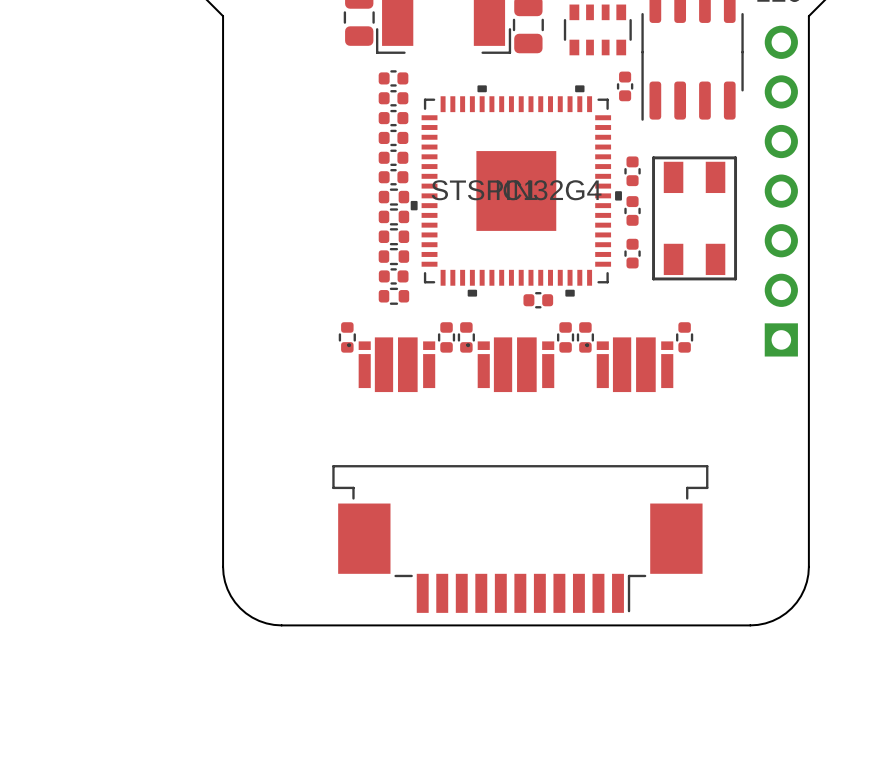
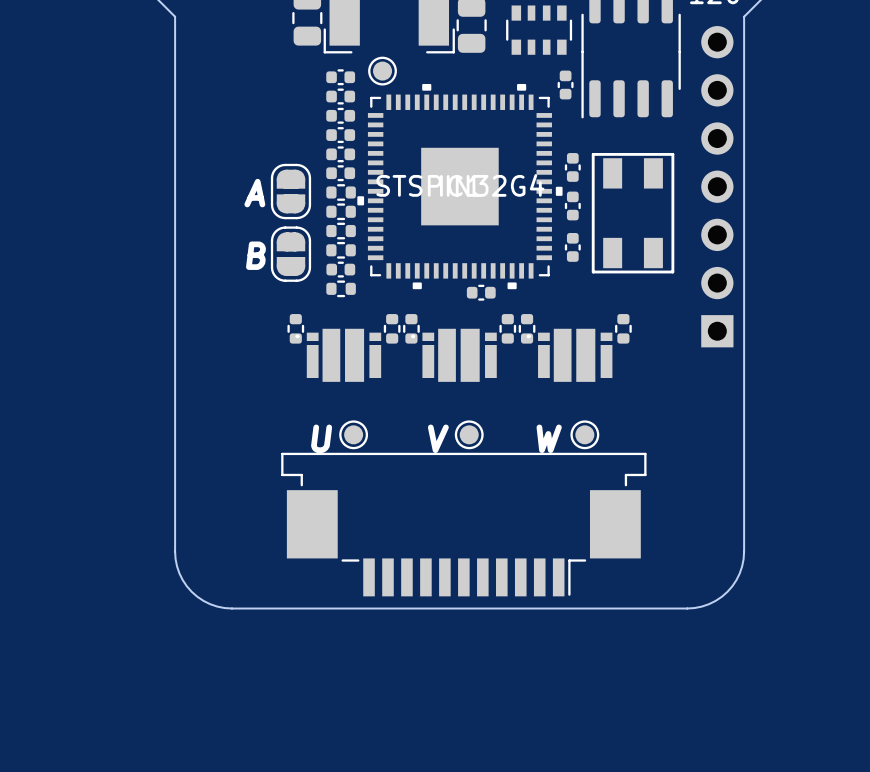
part: none -> (382, 71)
part: none -> (290, 191)
text: none -> A (254, 193)
part: none -> (290, 254)
text: none -> B (256, 255)
part: none -> (353, 434)
part: none -> (469, 434)
part: none -> (584, 434)
text: none -> U (321, 438)
text: none -> V (438, 438)
text: none -> W (549, 438)

